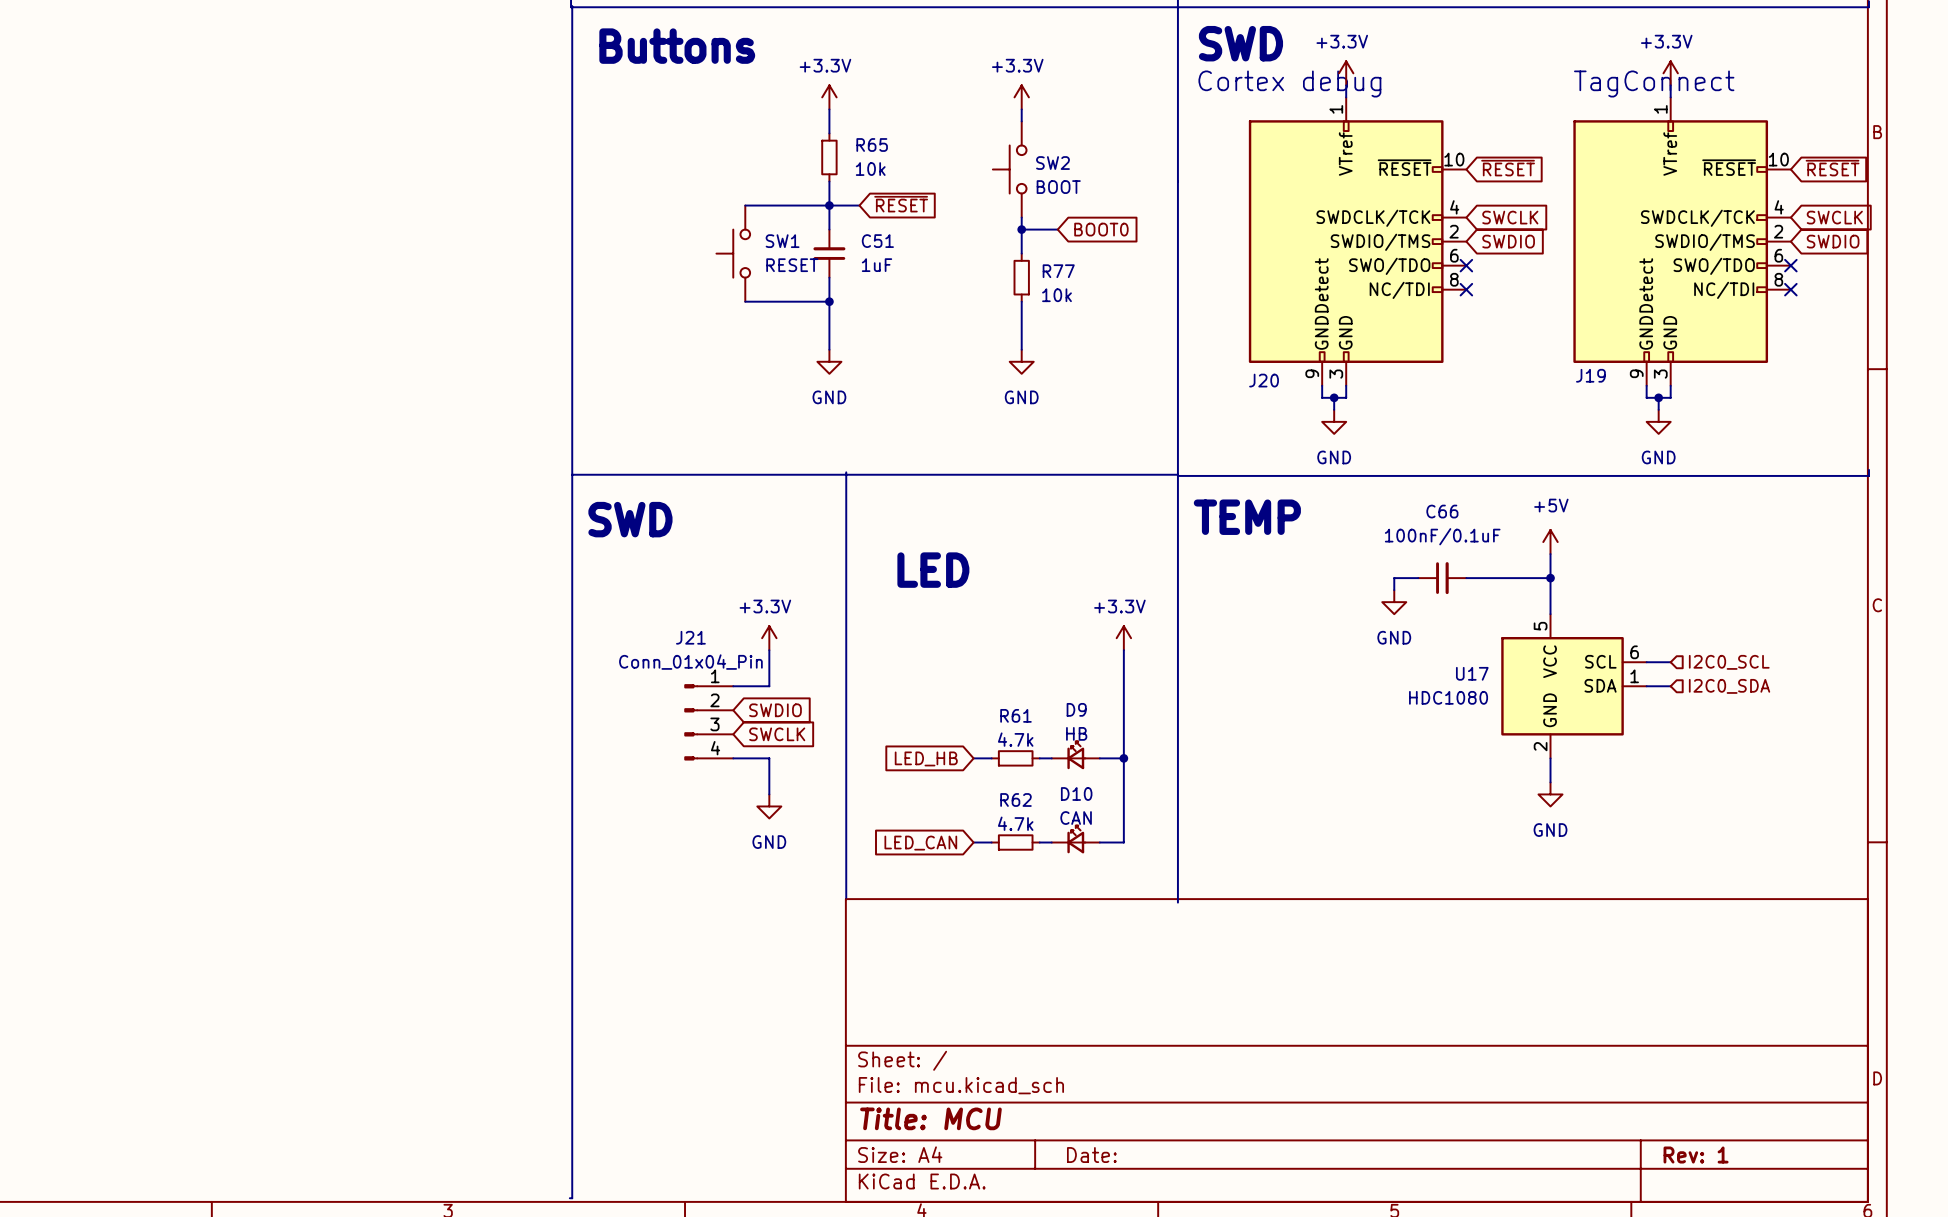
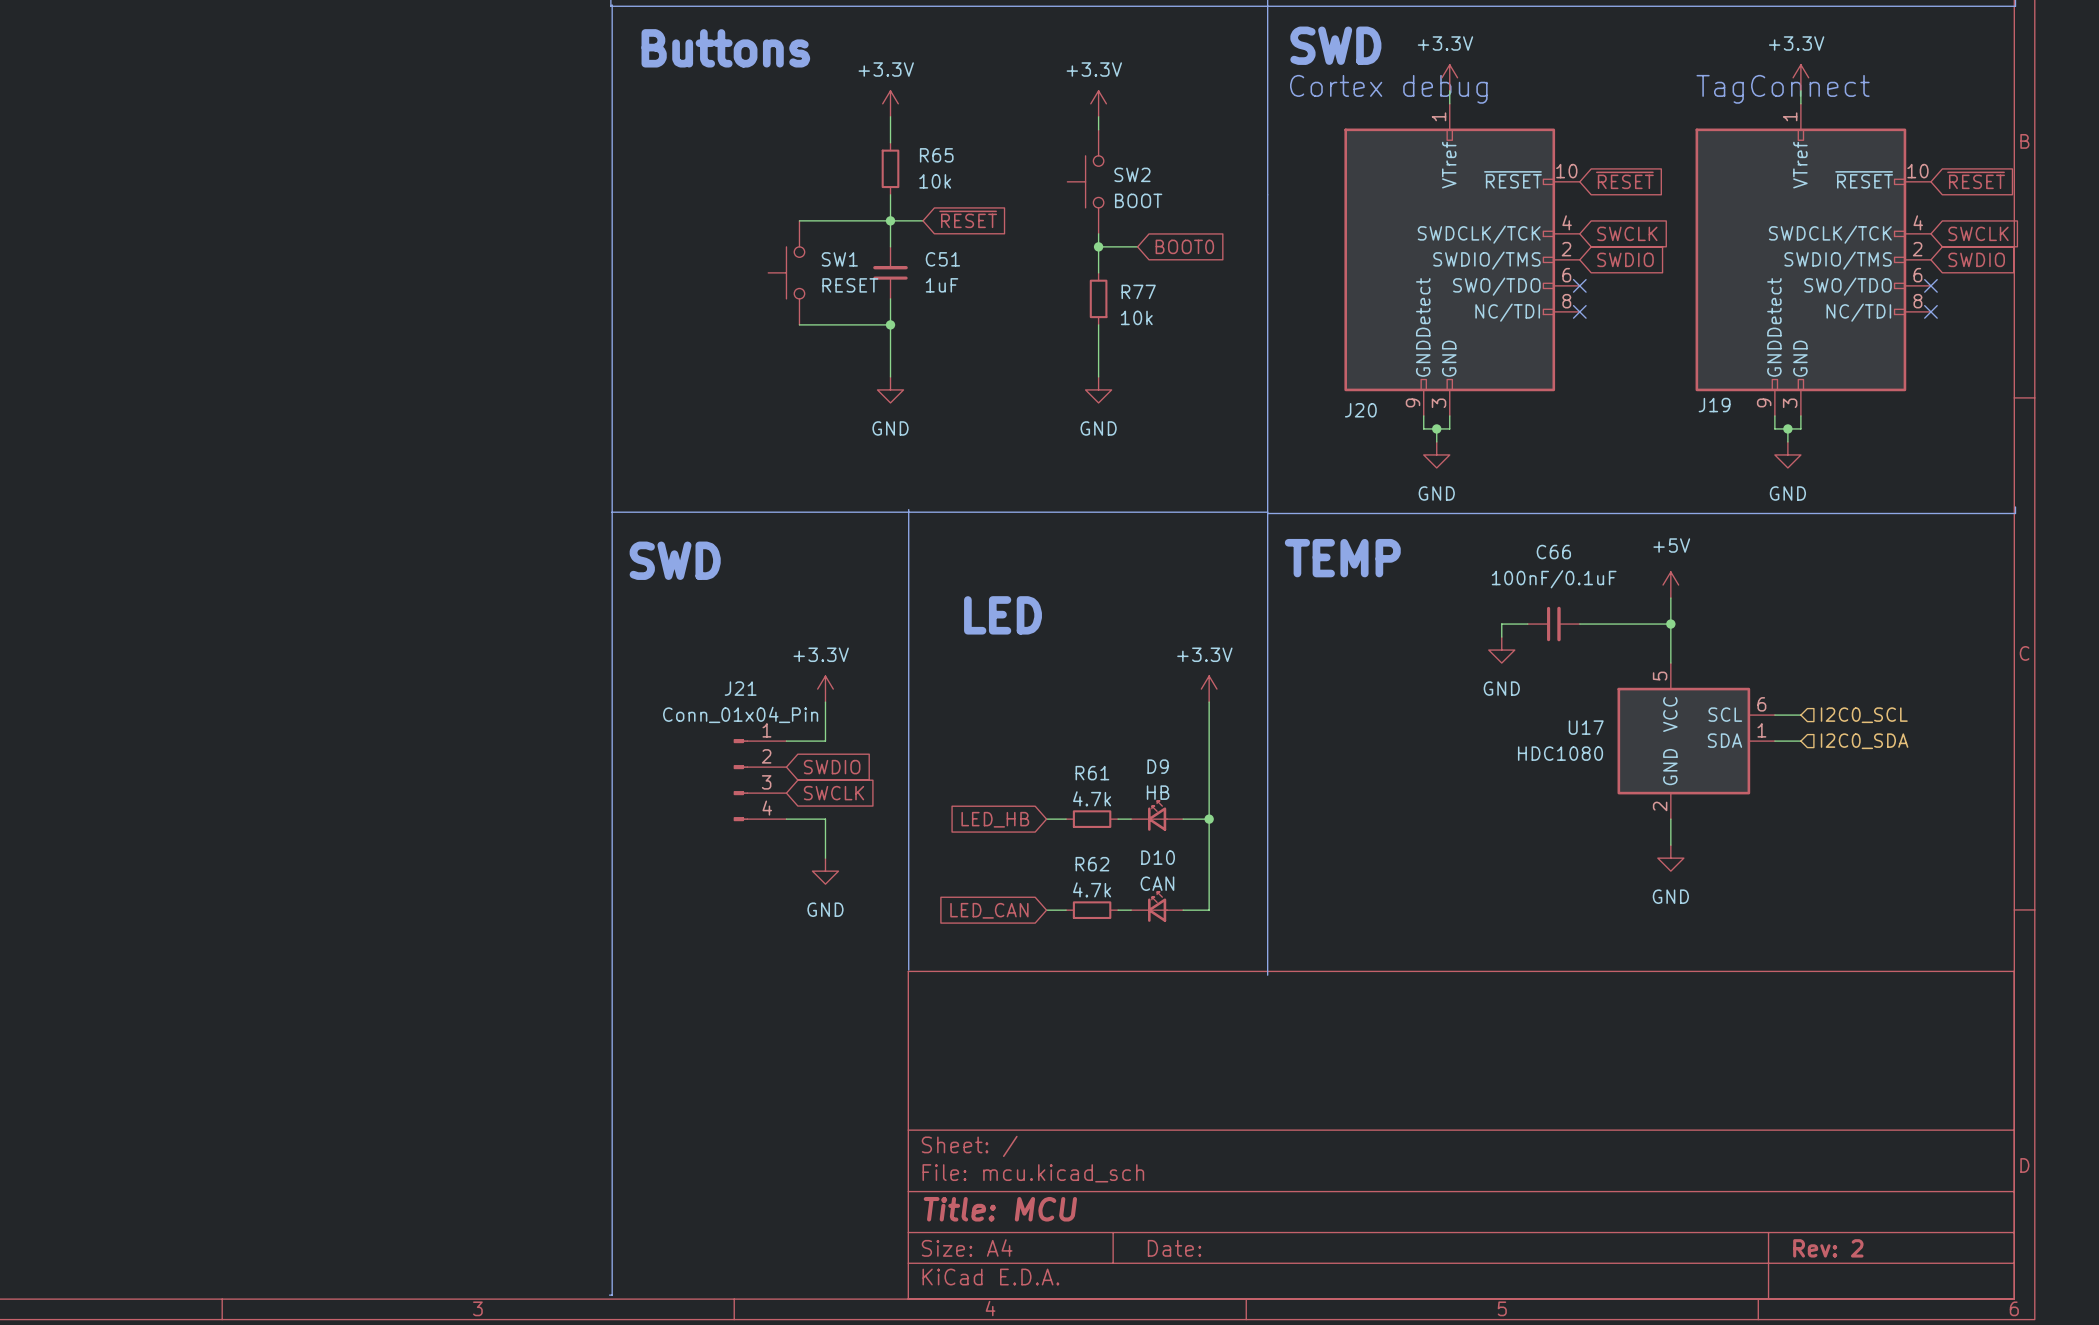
title block: Rev: 1 (1696, 1155) -> Rev: 2 (1828, 1248)

